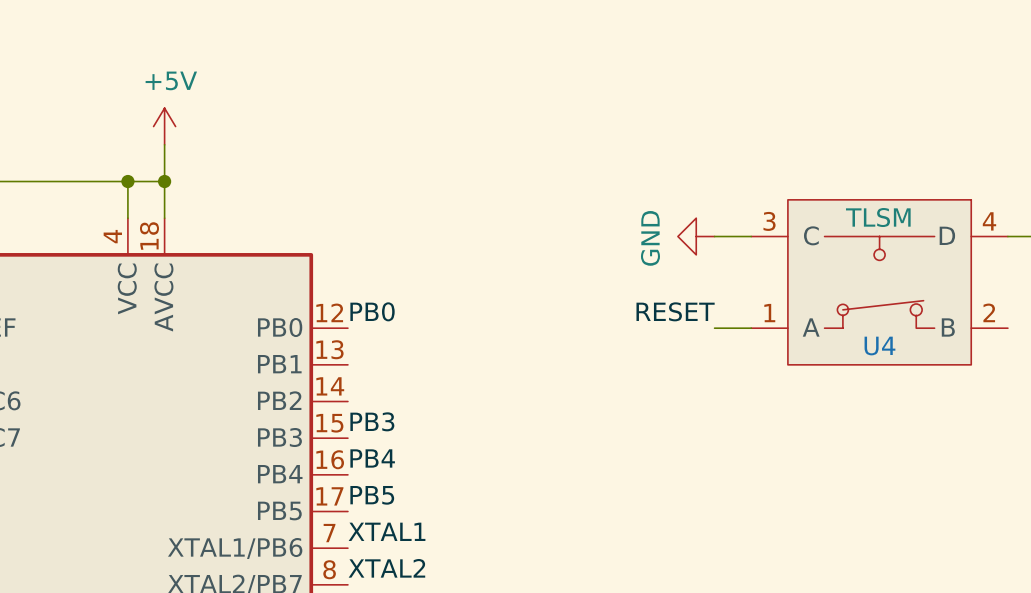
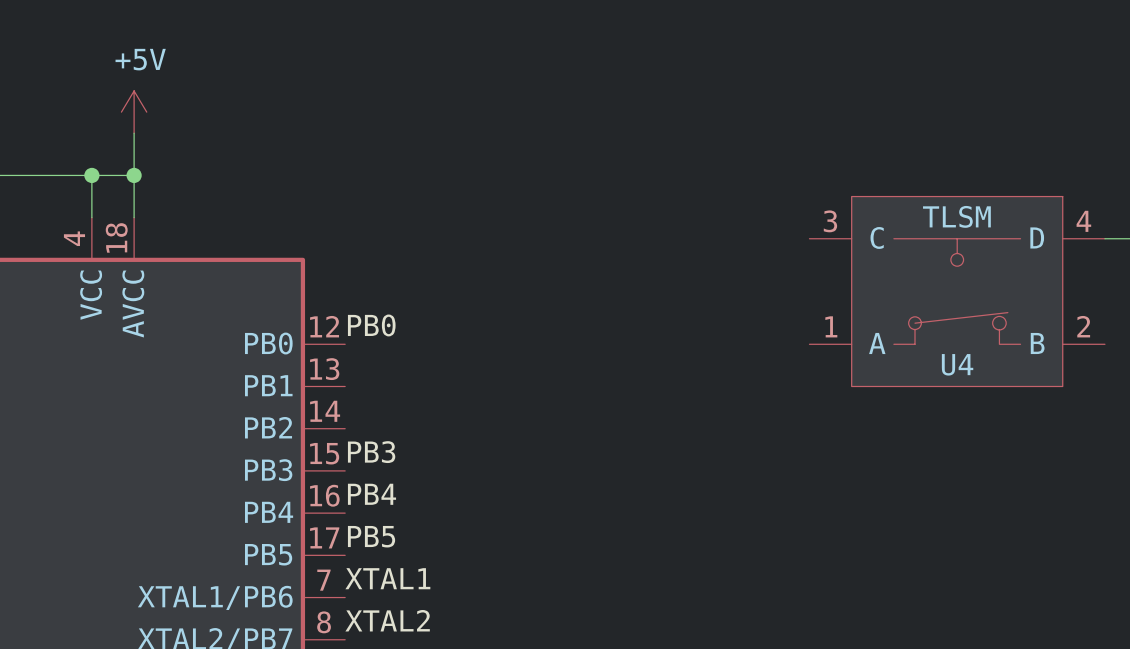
power symbol: GND (696, 236) -> none
wire: (714, 236) (751, 236) -> none
label: RESET (675, 311) -> none
wire: (714, 328) (751, 328) -> none

